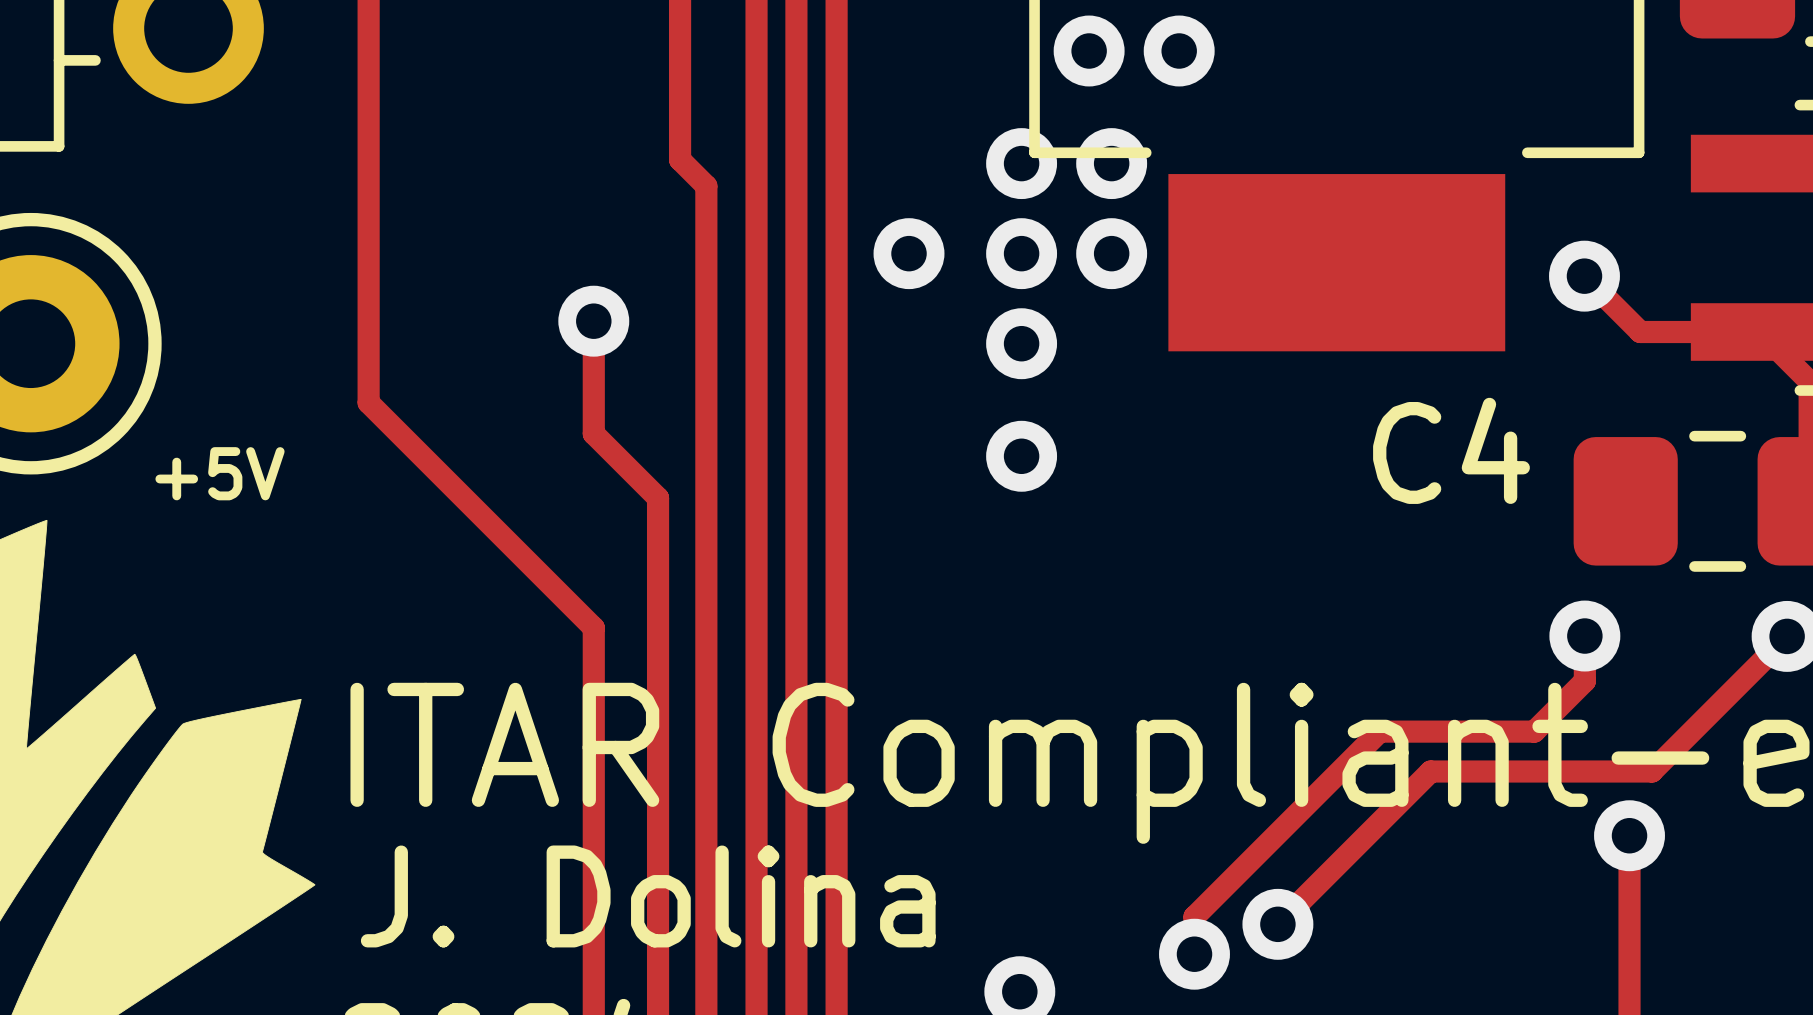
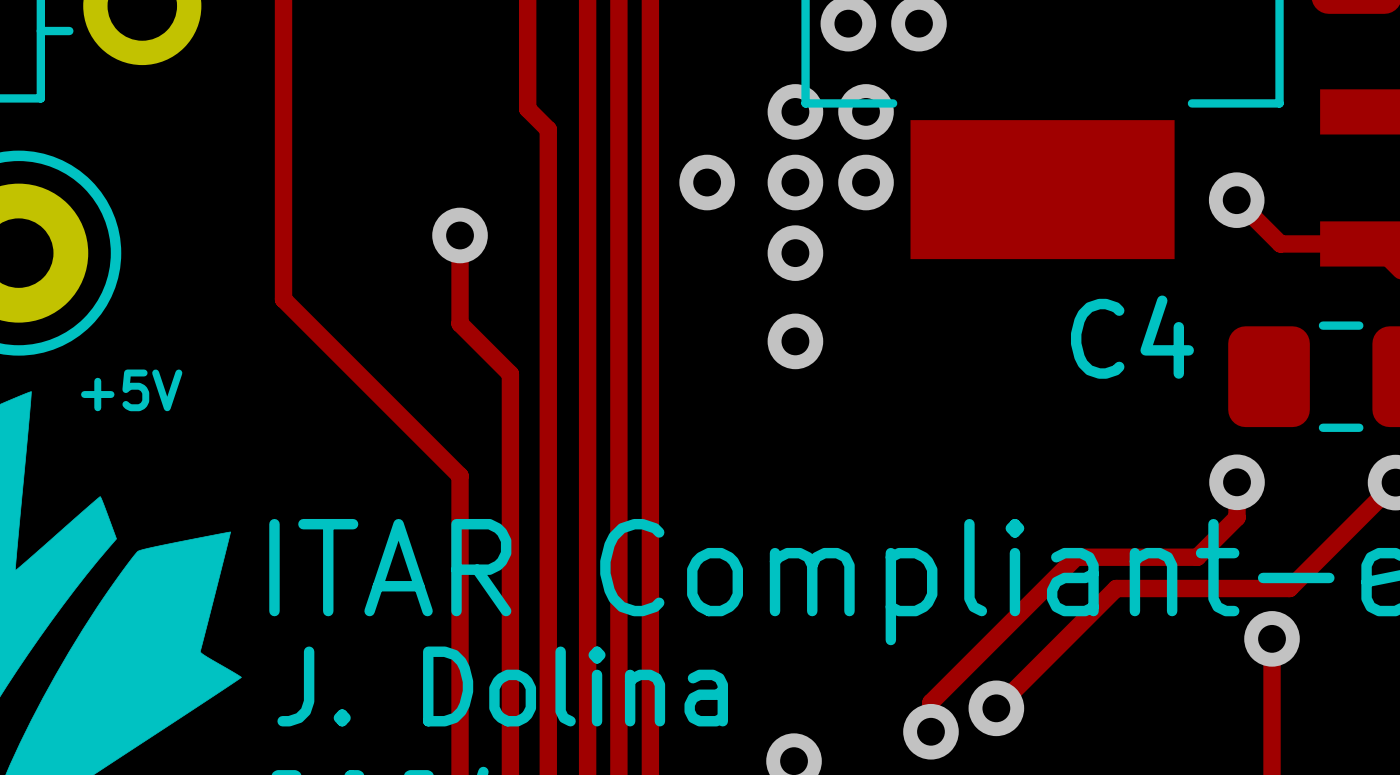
text position: +5V (220, 473) -> +5V (131, 390)

